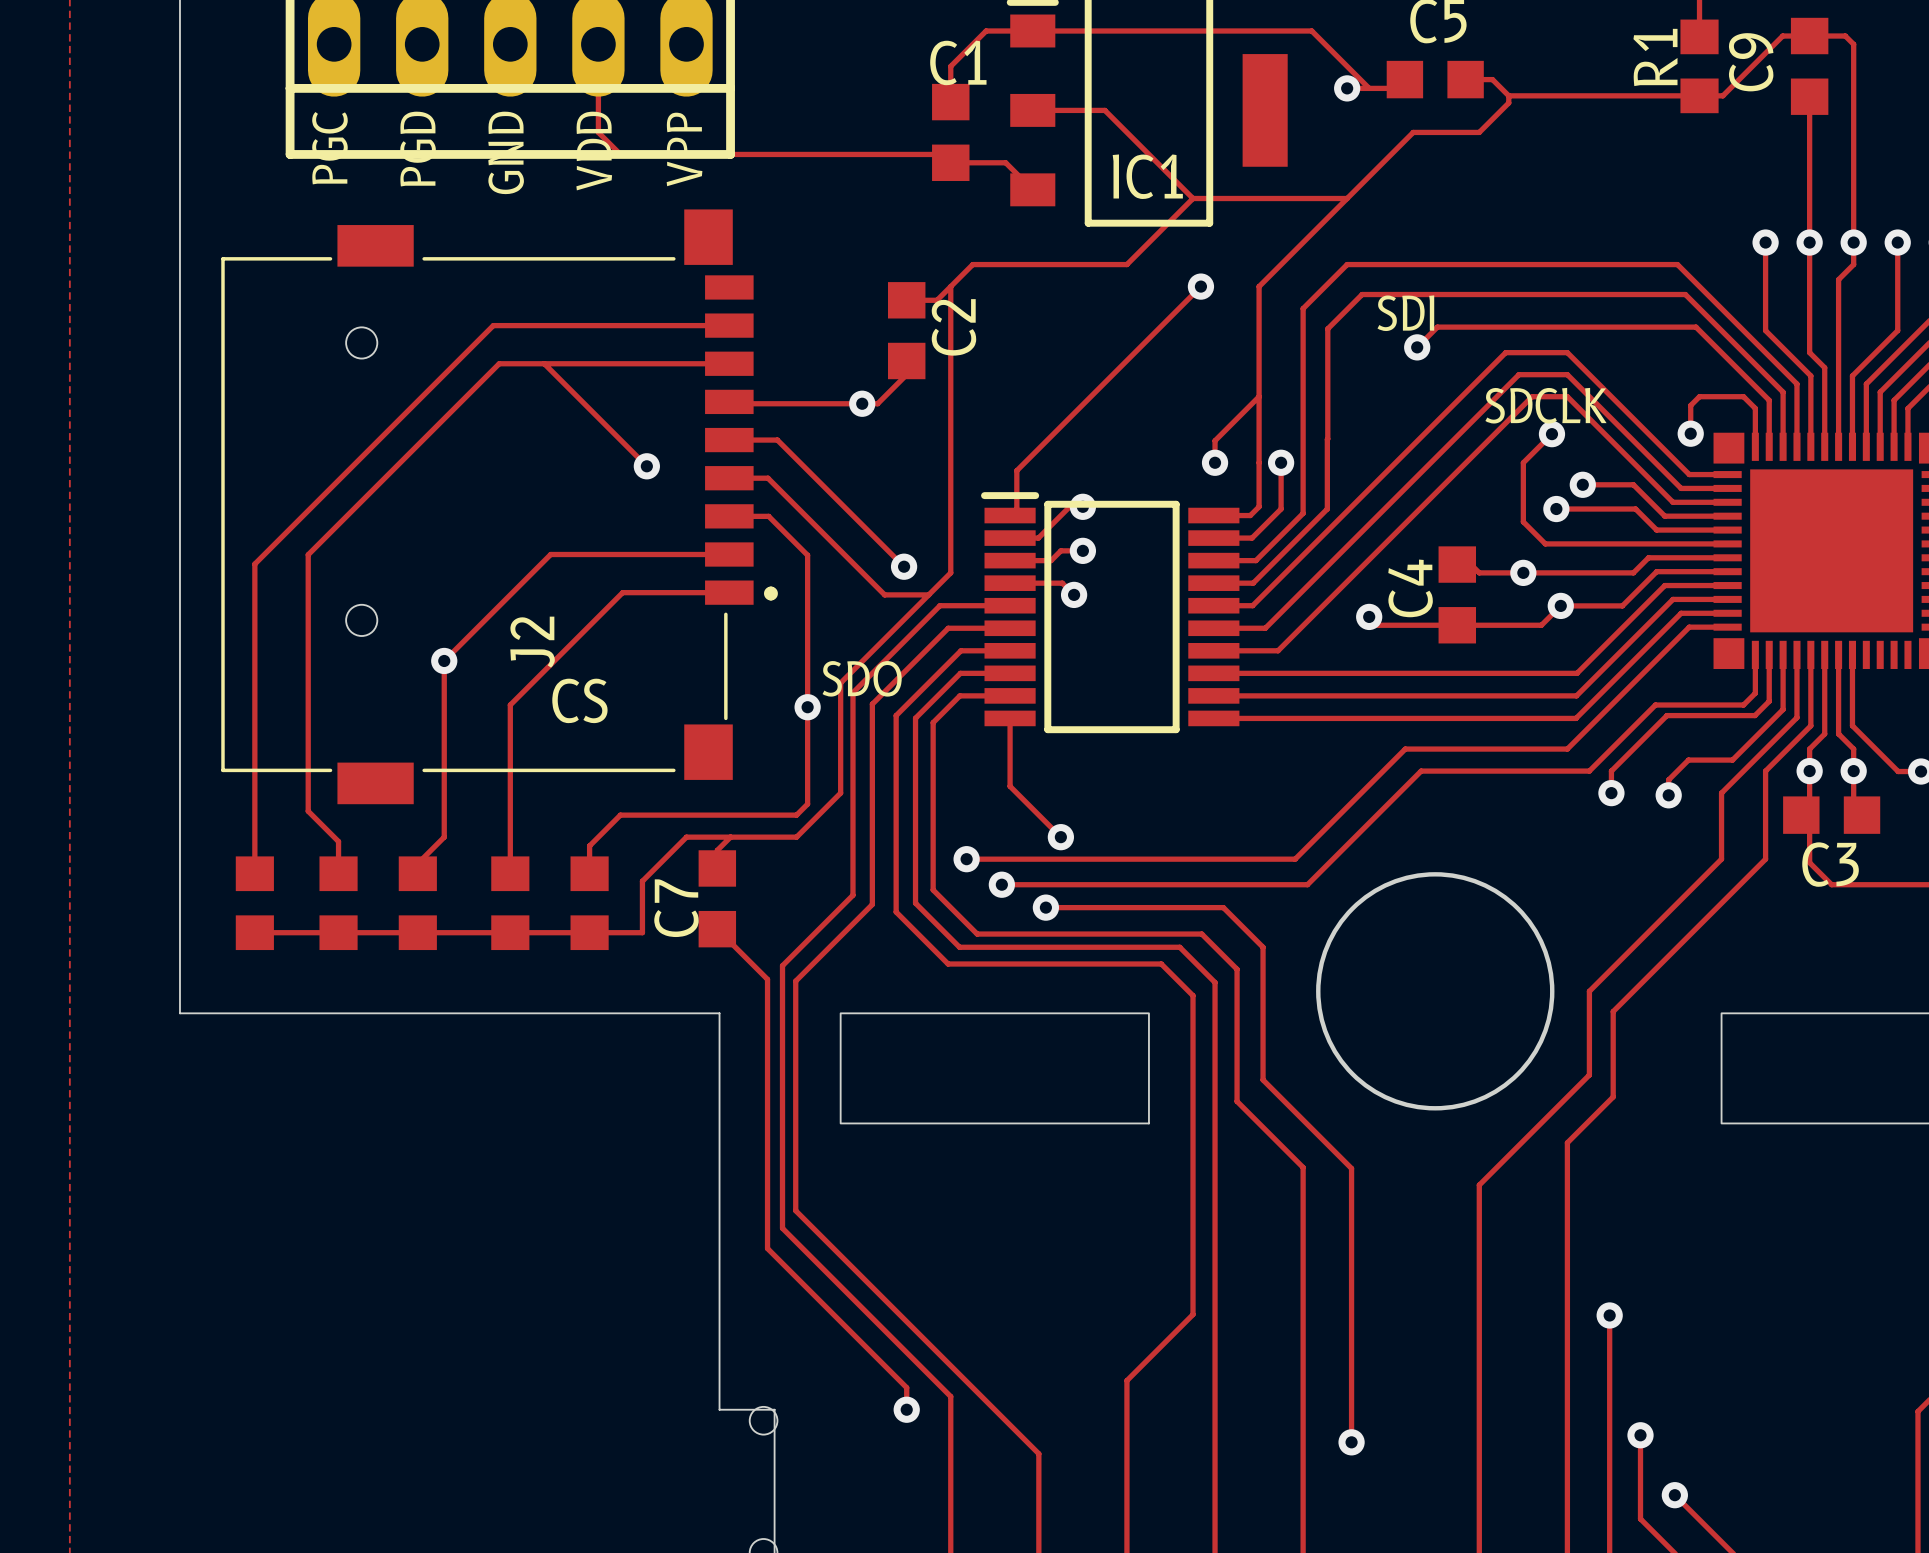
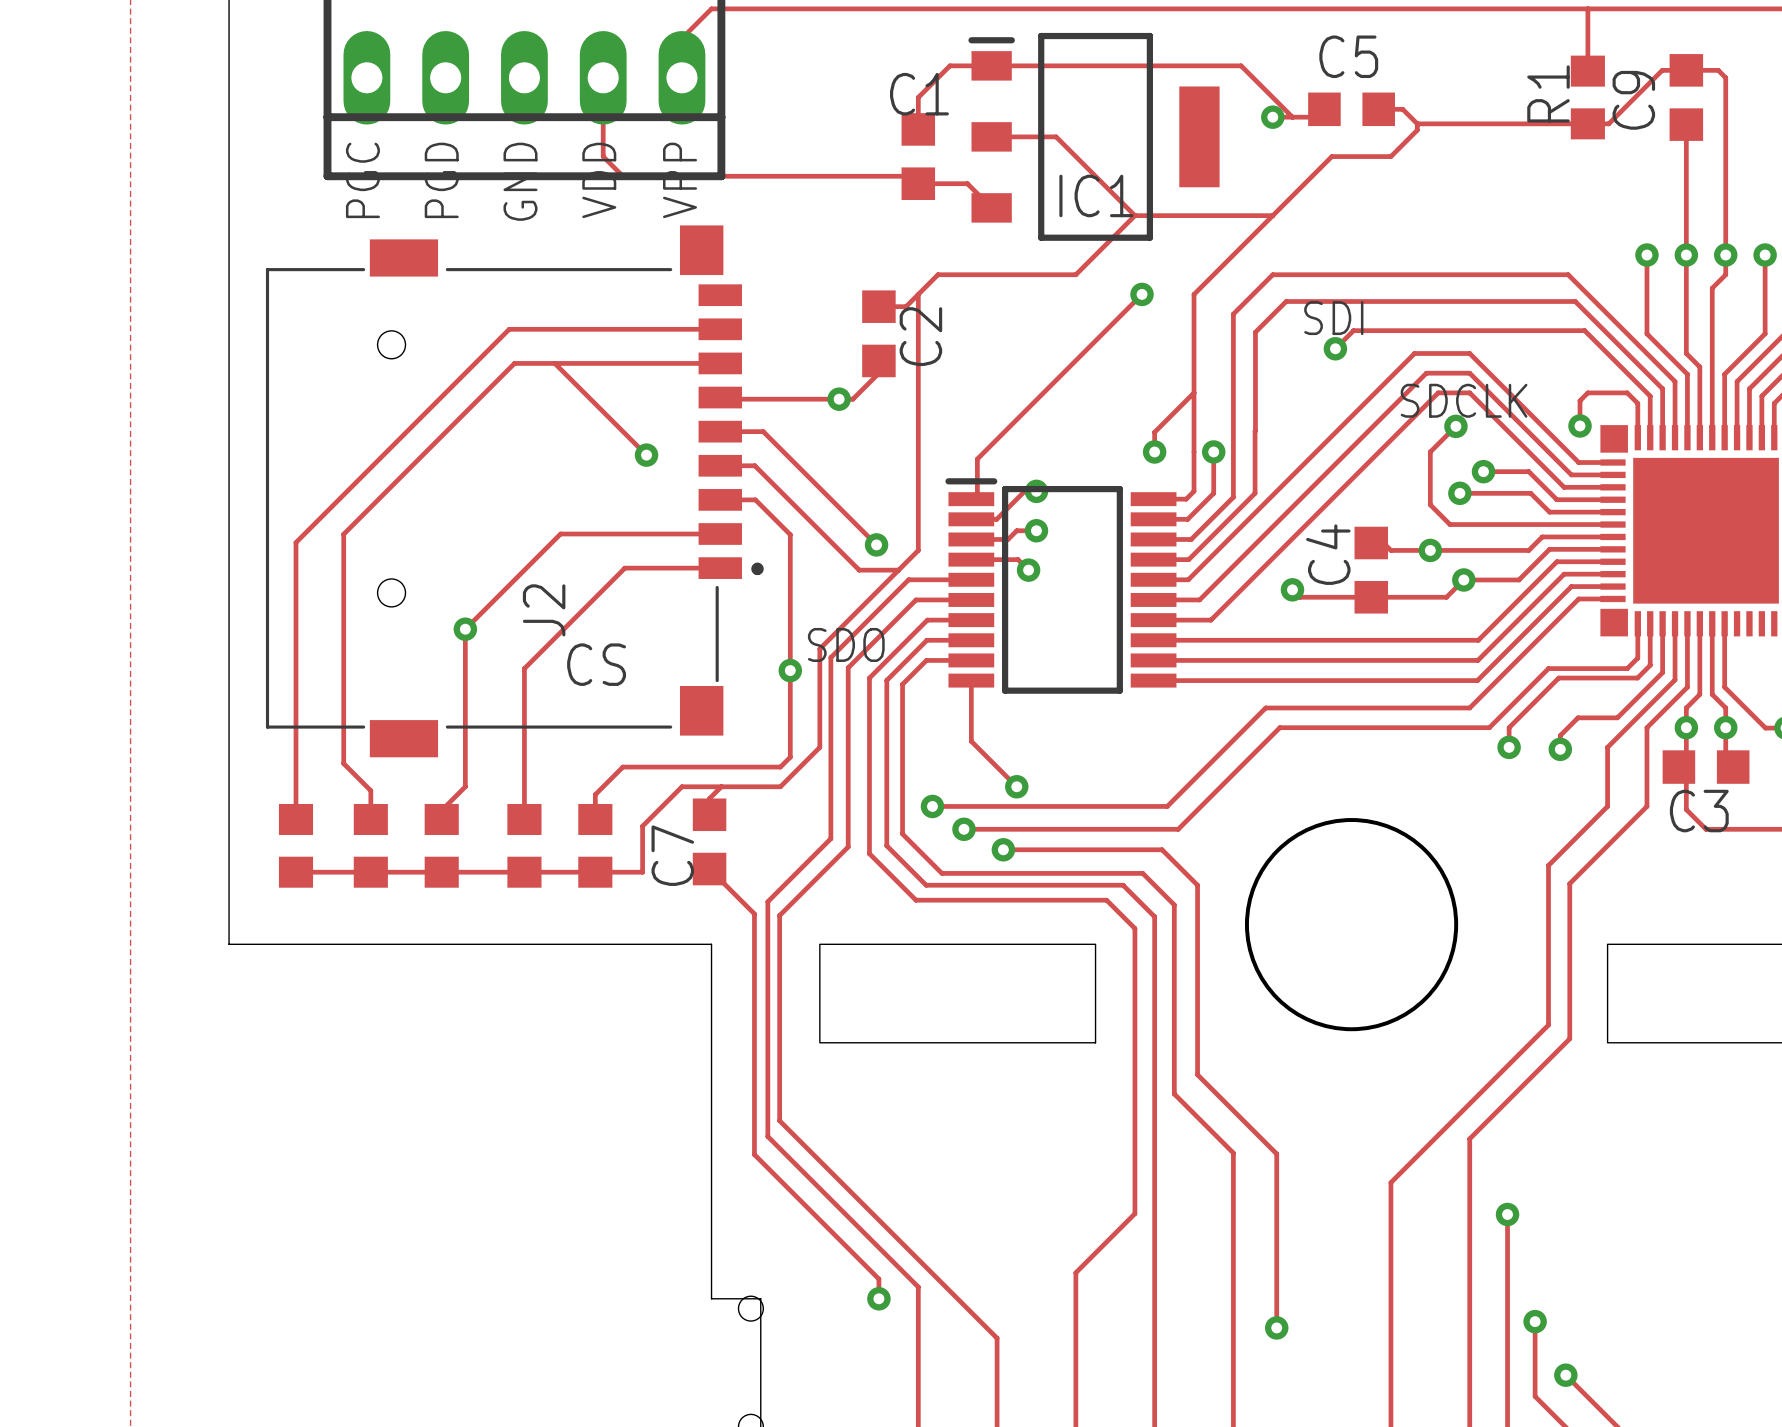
track: (1405, 749) (1295, 859) (1229, 859) -> (1324, 707) (1265, 707) (1167, 806)
track: (1421, 771) (1307, 884) (1241, 884) -> (1338, 727) (1279, 727) (1178, 829)
track: (1655, 925) (1589, 991) (1589, 1074) (1479, 1185) (1479, 1279) -> (1548, 865) (1548, 1025) (1390, 1182)
track: (1679, 945) (1613, 1011) (1613, 1096) (1567, 1142) (1567, 1230) -> (1569, 883) (1569, 1038) (1469, 1138)
track: (1263, 1079) (1351, 1168) (1351, 1247) -> (1197, 1003) (1197, 1074) (1276, 1153)
track: (1237, 1101) (1303, 1167) (1303, 1246) -> (1174, 1023) (1174, 1093) (1233, 1153)

